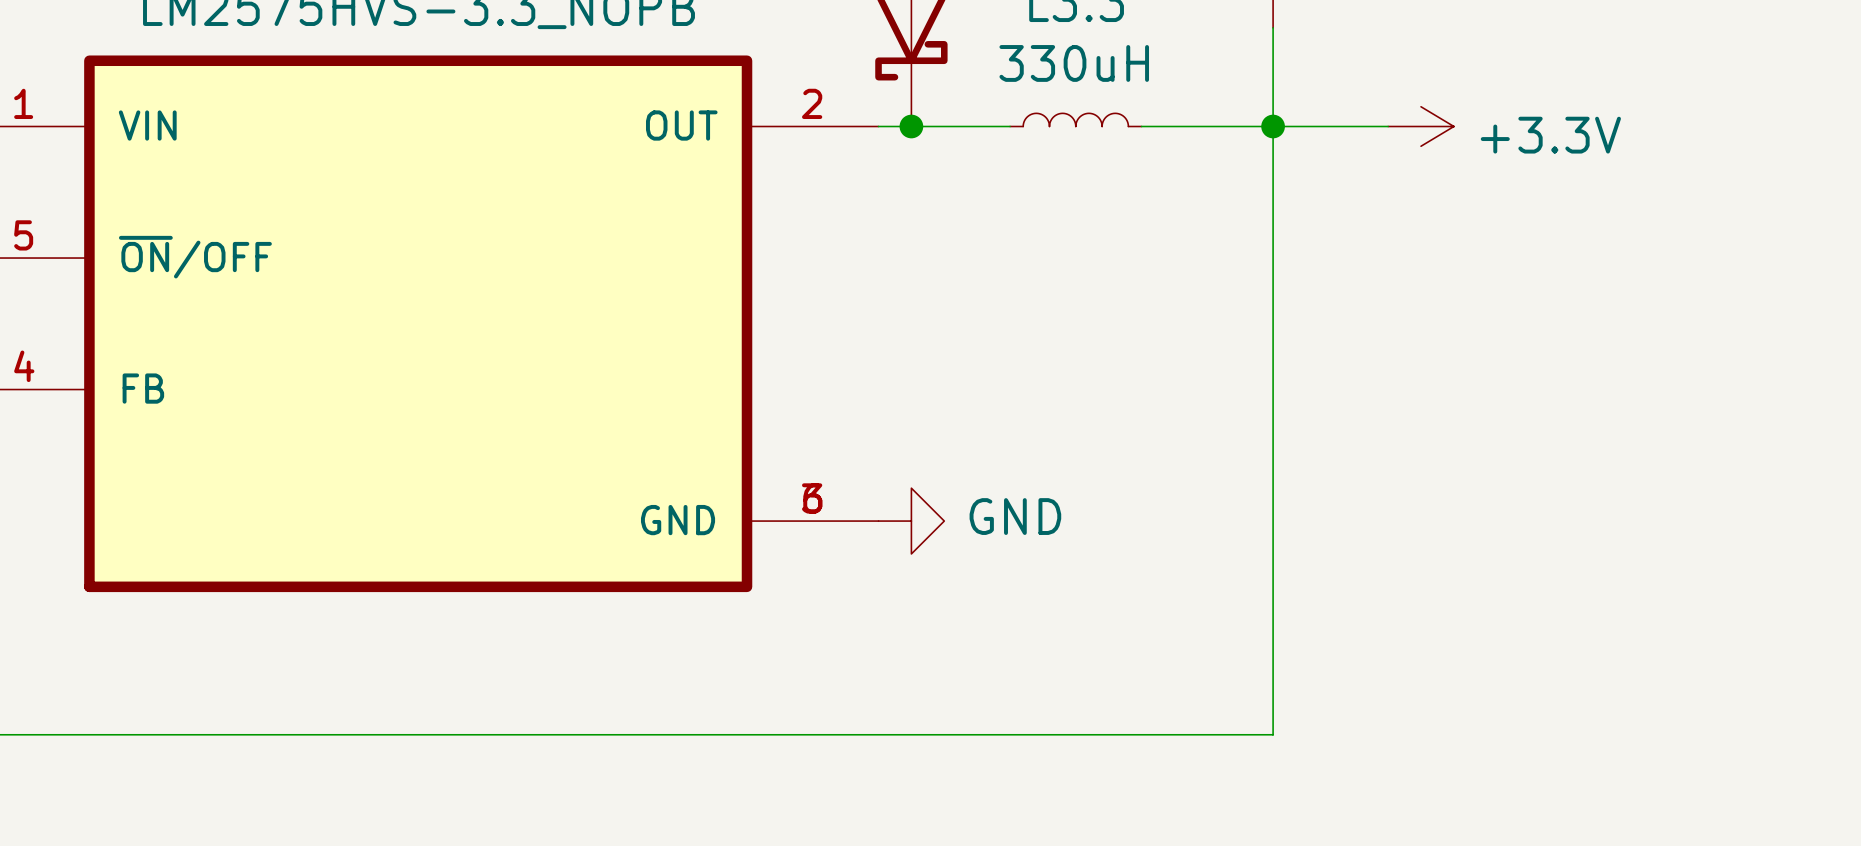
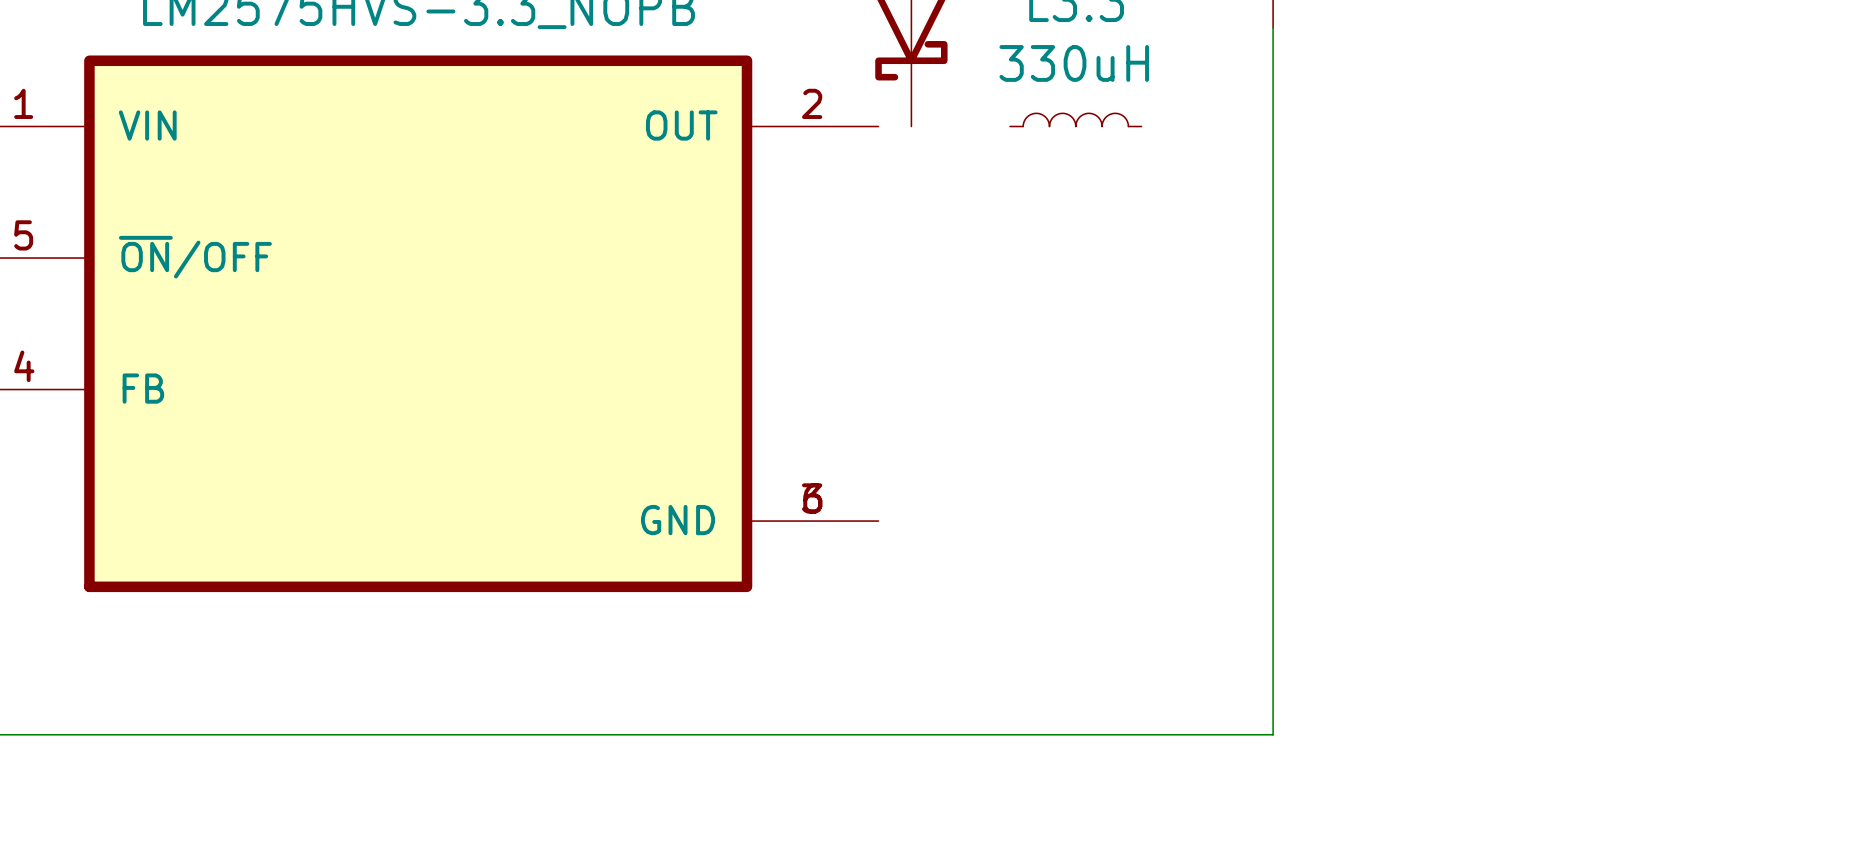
wire: (878, 126) (1010, 126) -> none
junction: (911, 126) -> none
wire: (1141, 126) (1388, 126) -> none
junction: (1273, 126) -> none
power symbol: +3.3V (1421, 126) -> none
power symbol: GND (911, 521) -> none

